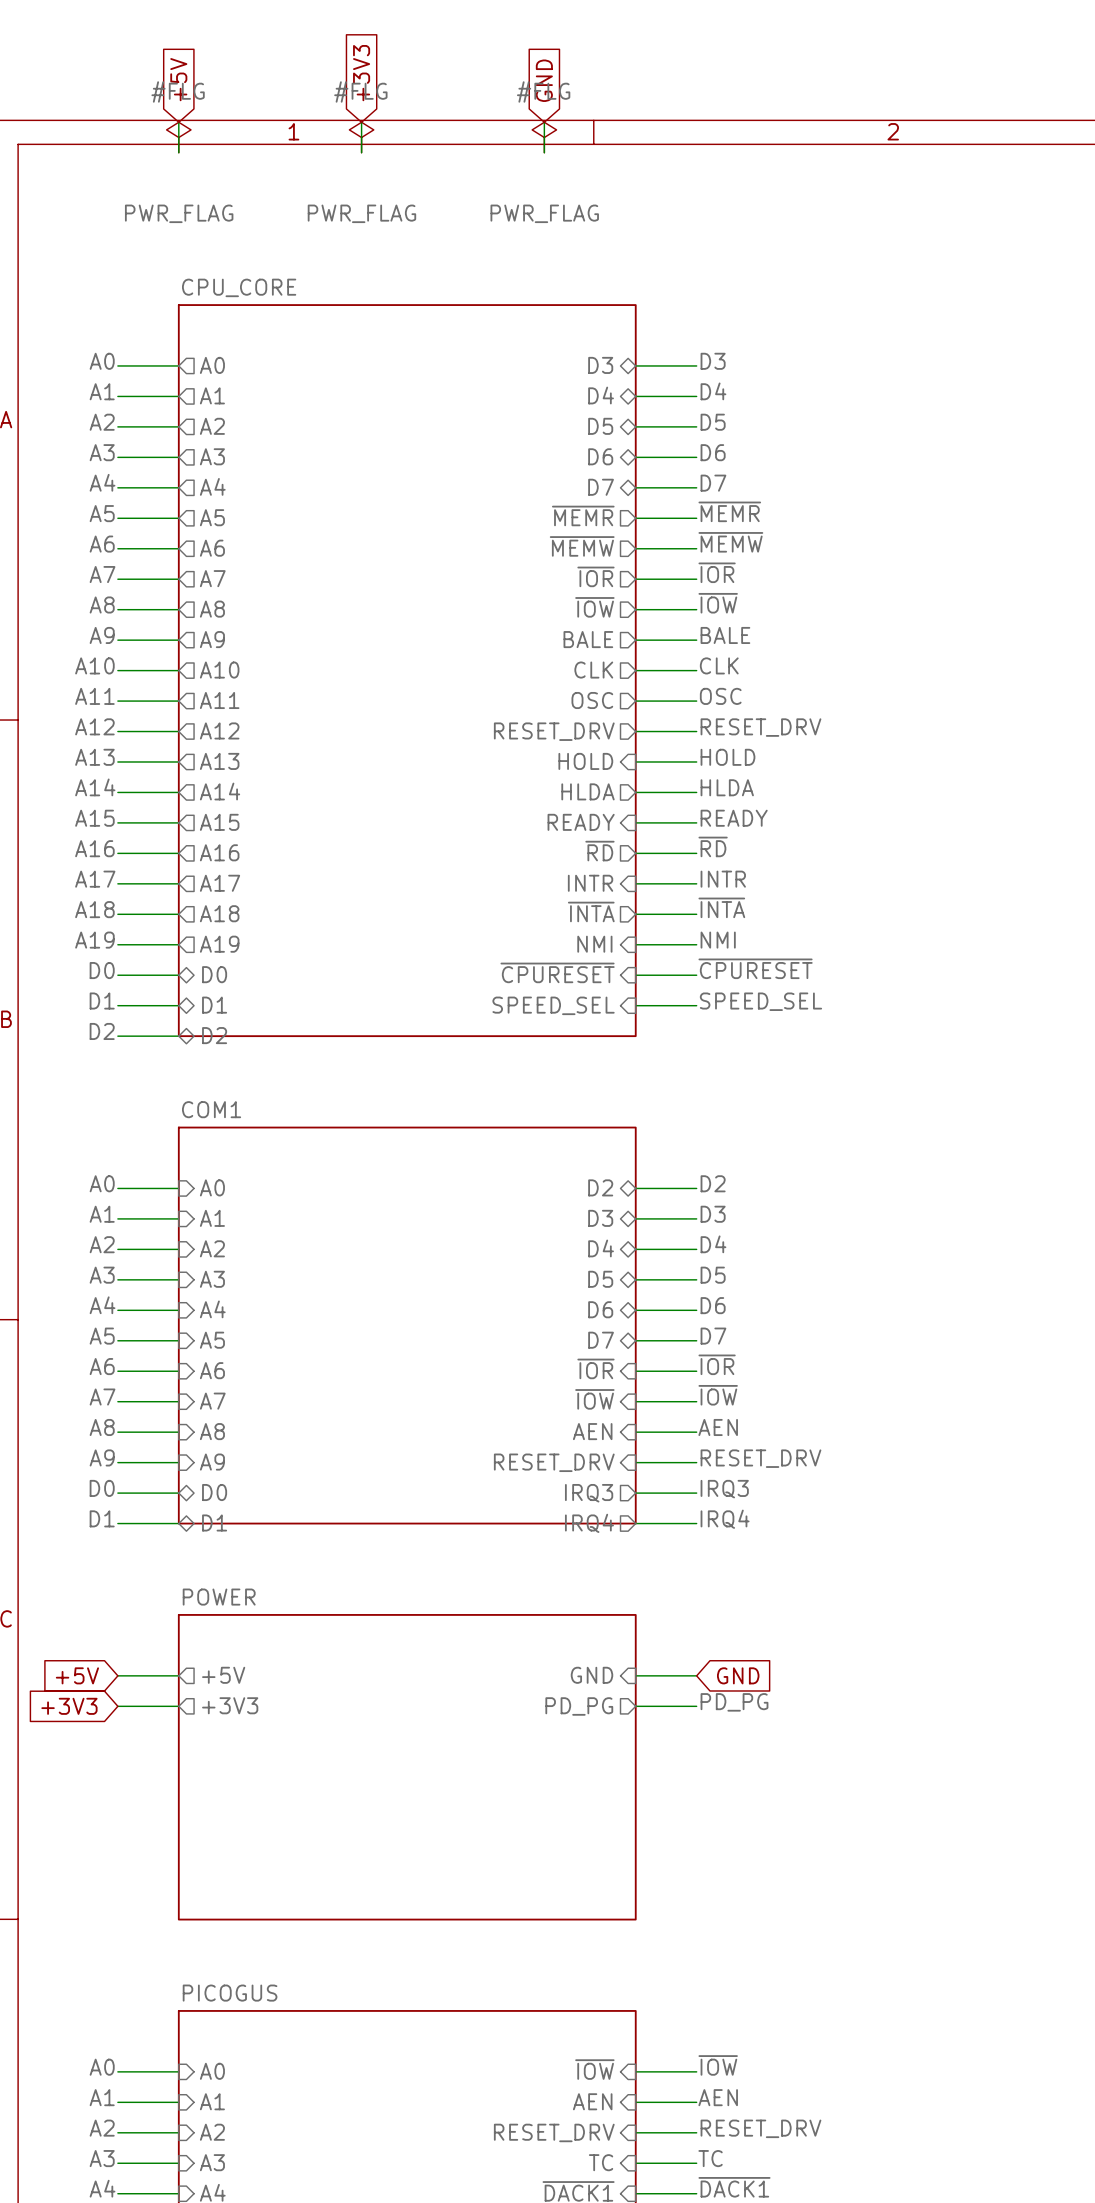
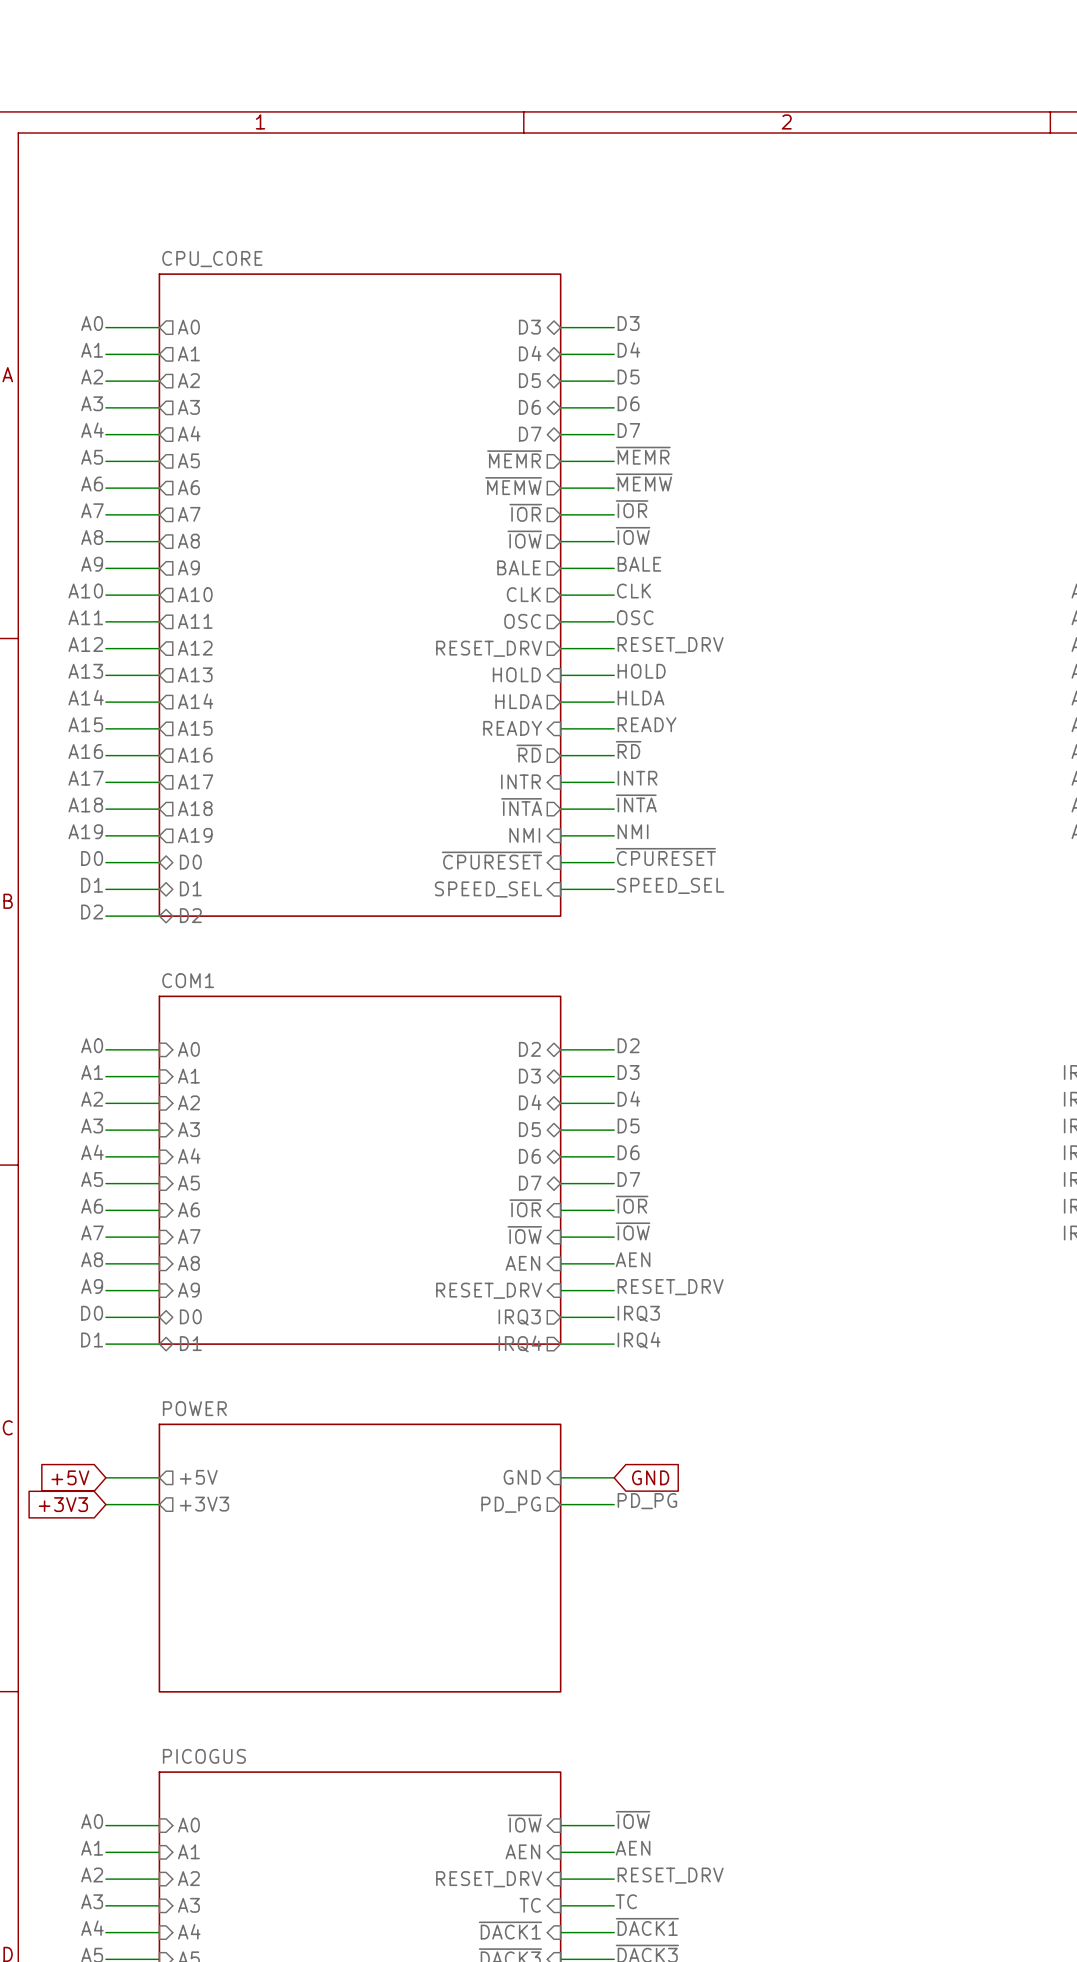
global label: +3V3 (361, 73) -> none
global label: +5V (178, 79) -> none
global label: GND (544, 80) -> none
wire: (178, 122) (178, 152) -> none
wire: (361, 122) (361, 152) -> none
wire: (544, 122) (544, 152) -> none
#FLG: PWR_FLAG (178, 137) -> none
#FLG: PWR_FLAG (361, 137) -> none
#FLG: PWR_FLAG (544, 137) -> none

